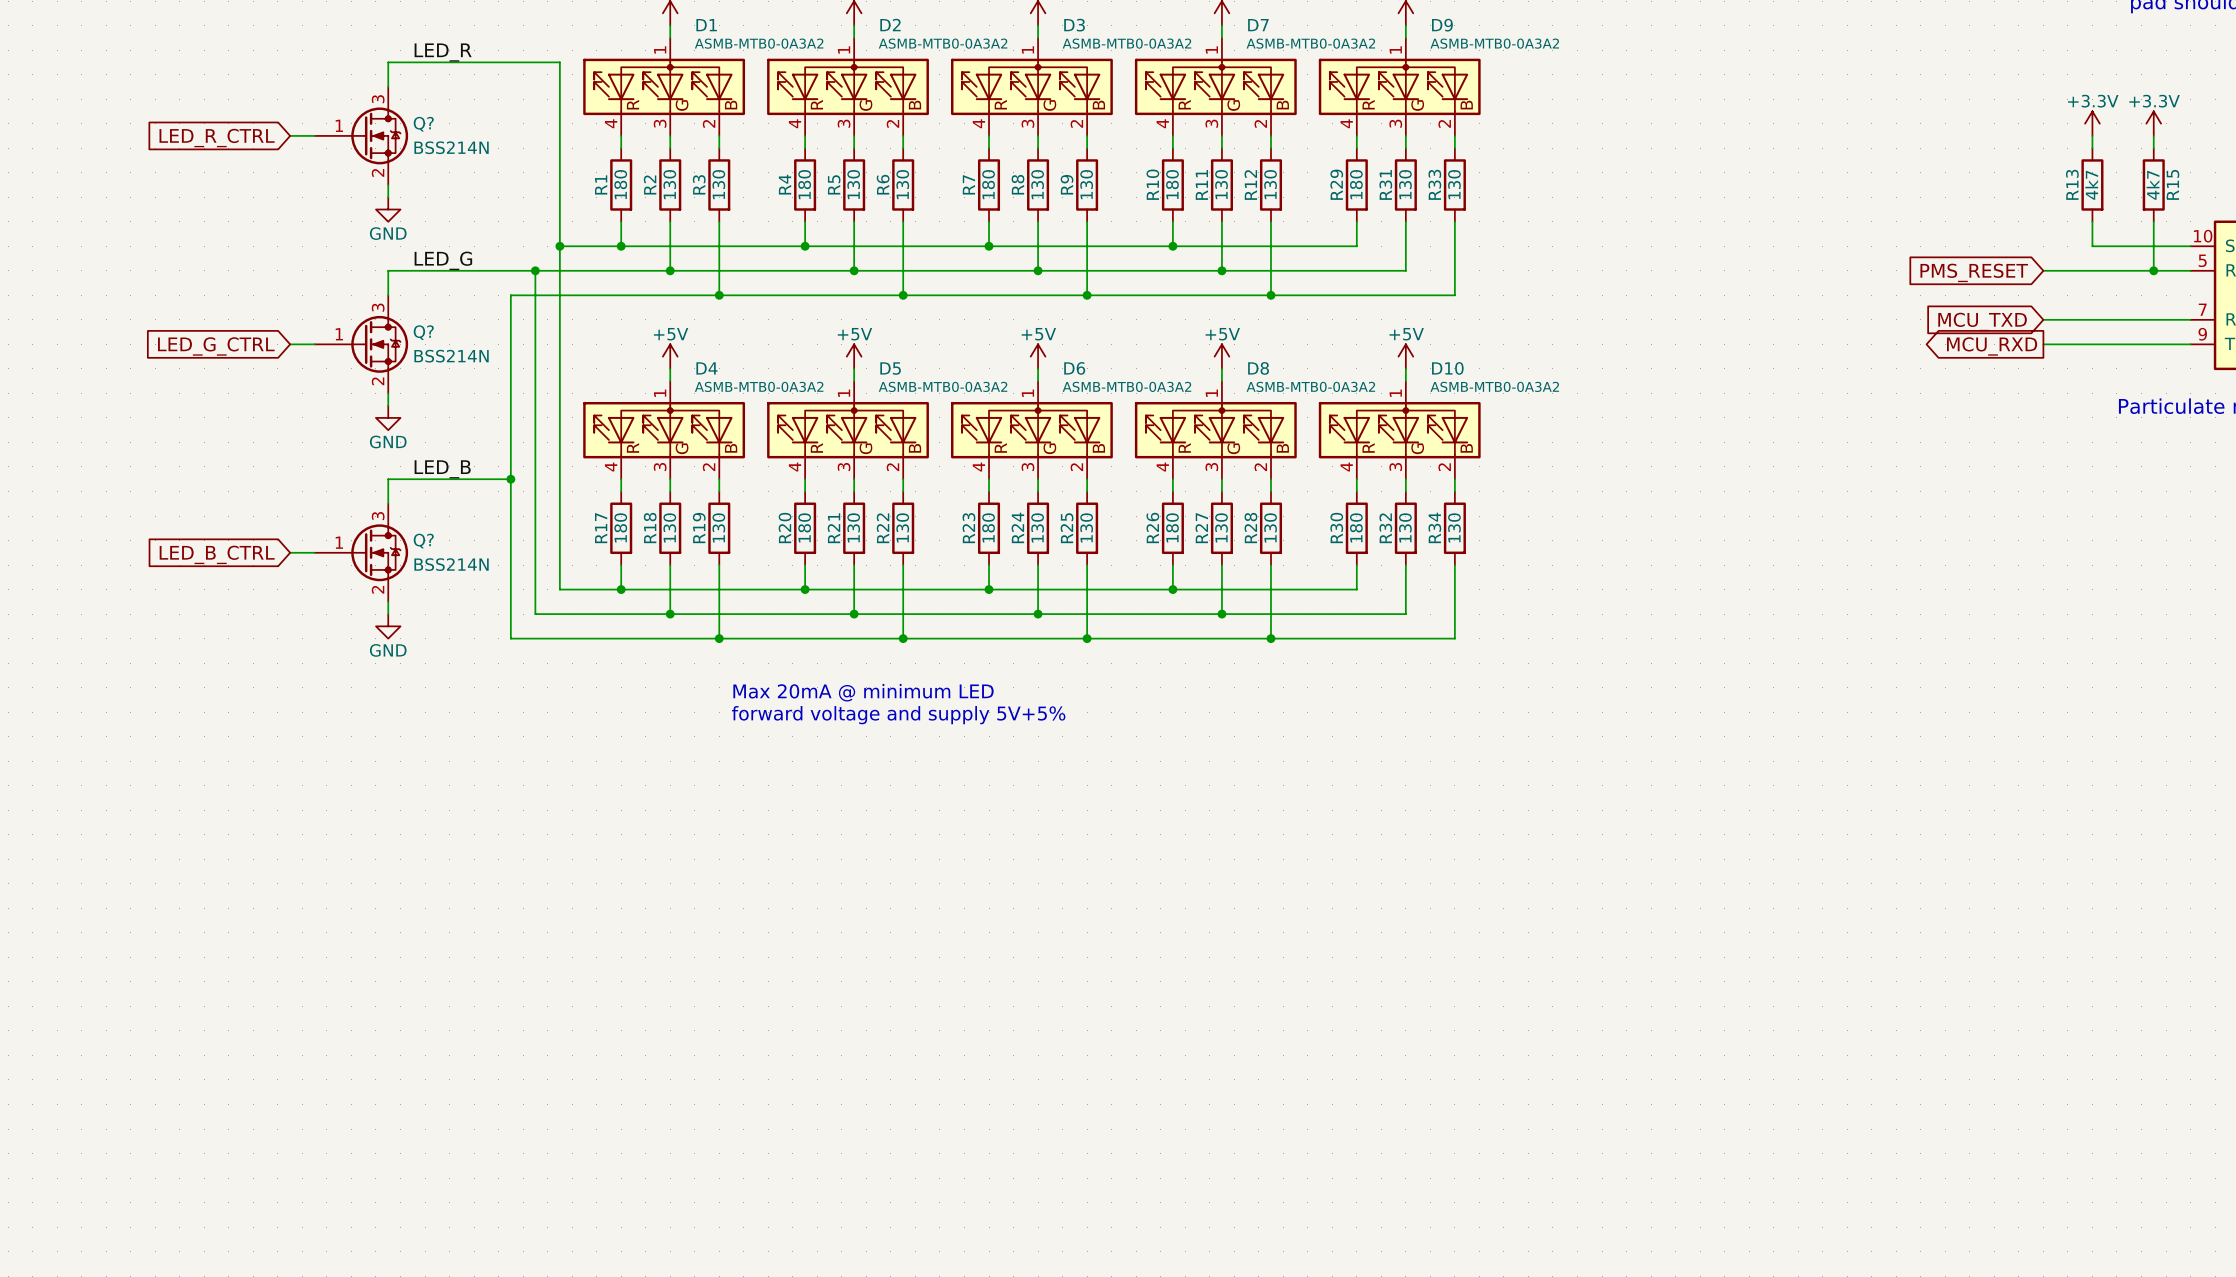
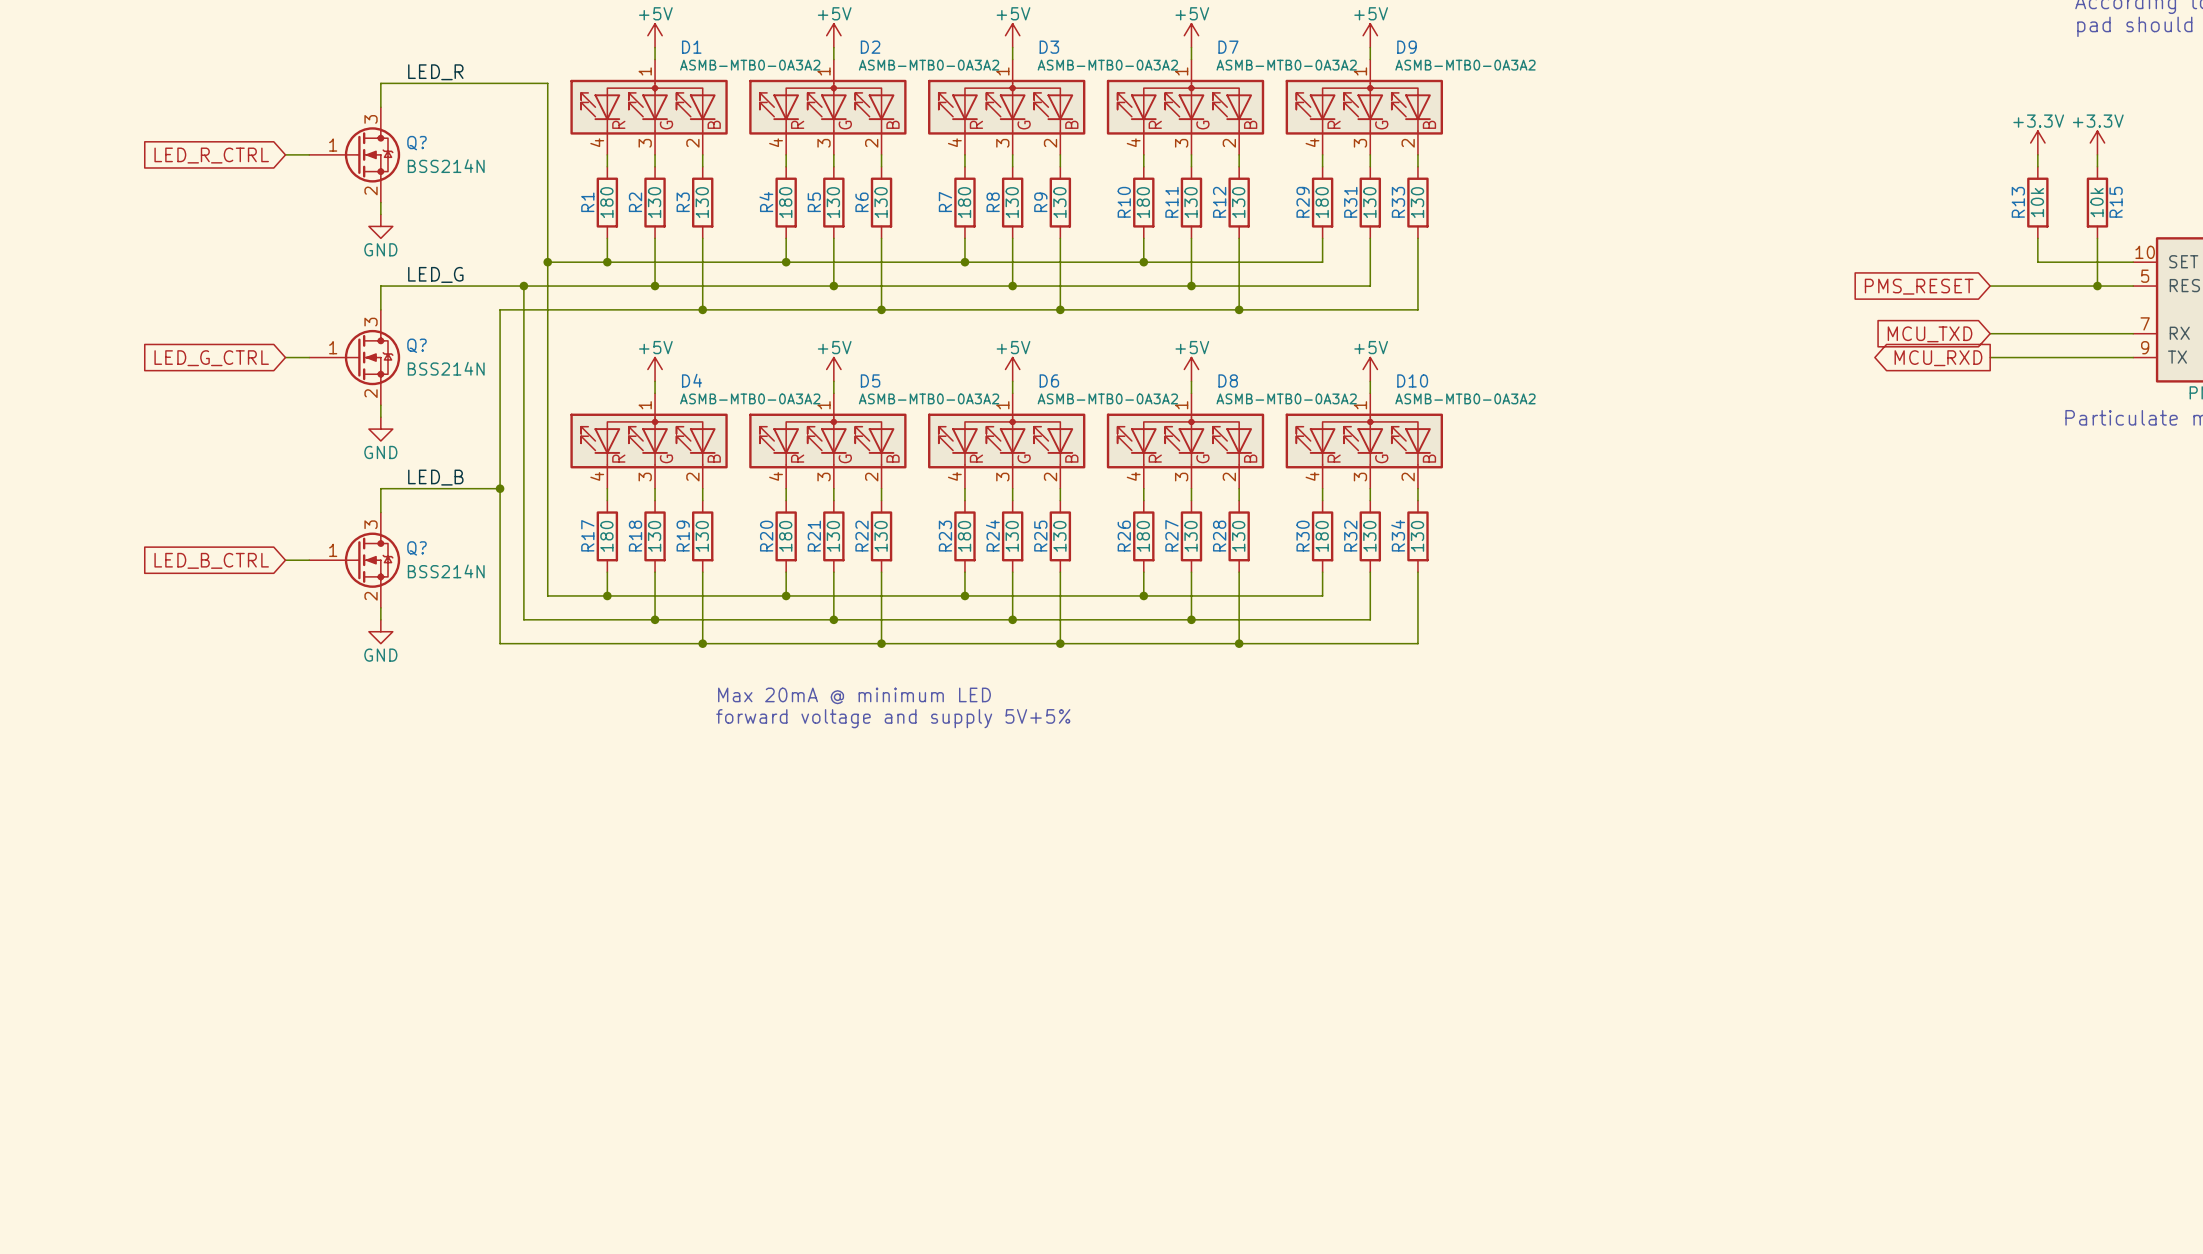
R13 value: 4k7 (2091, 185) -> 10k (2037, 202)
R15 value: 4k7 (2153, 185) -> 10k (2097, 202)

